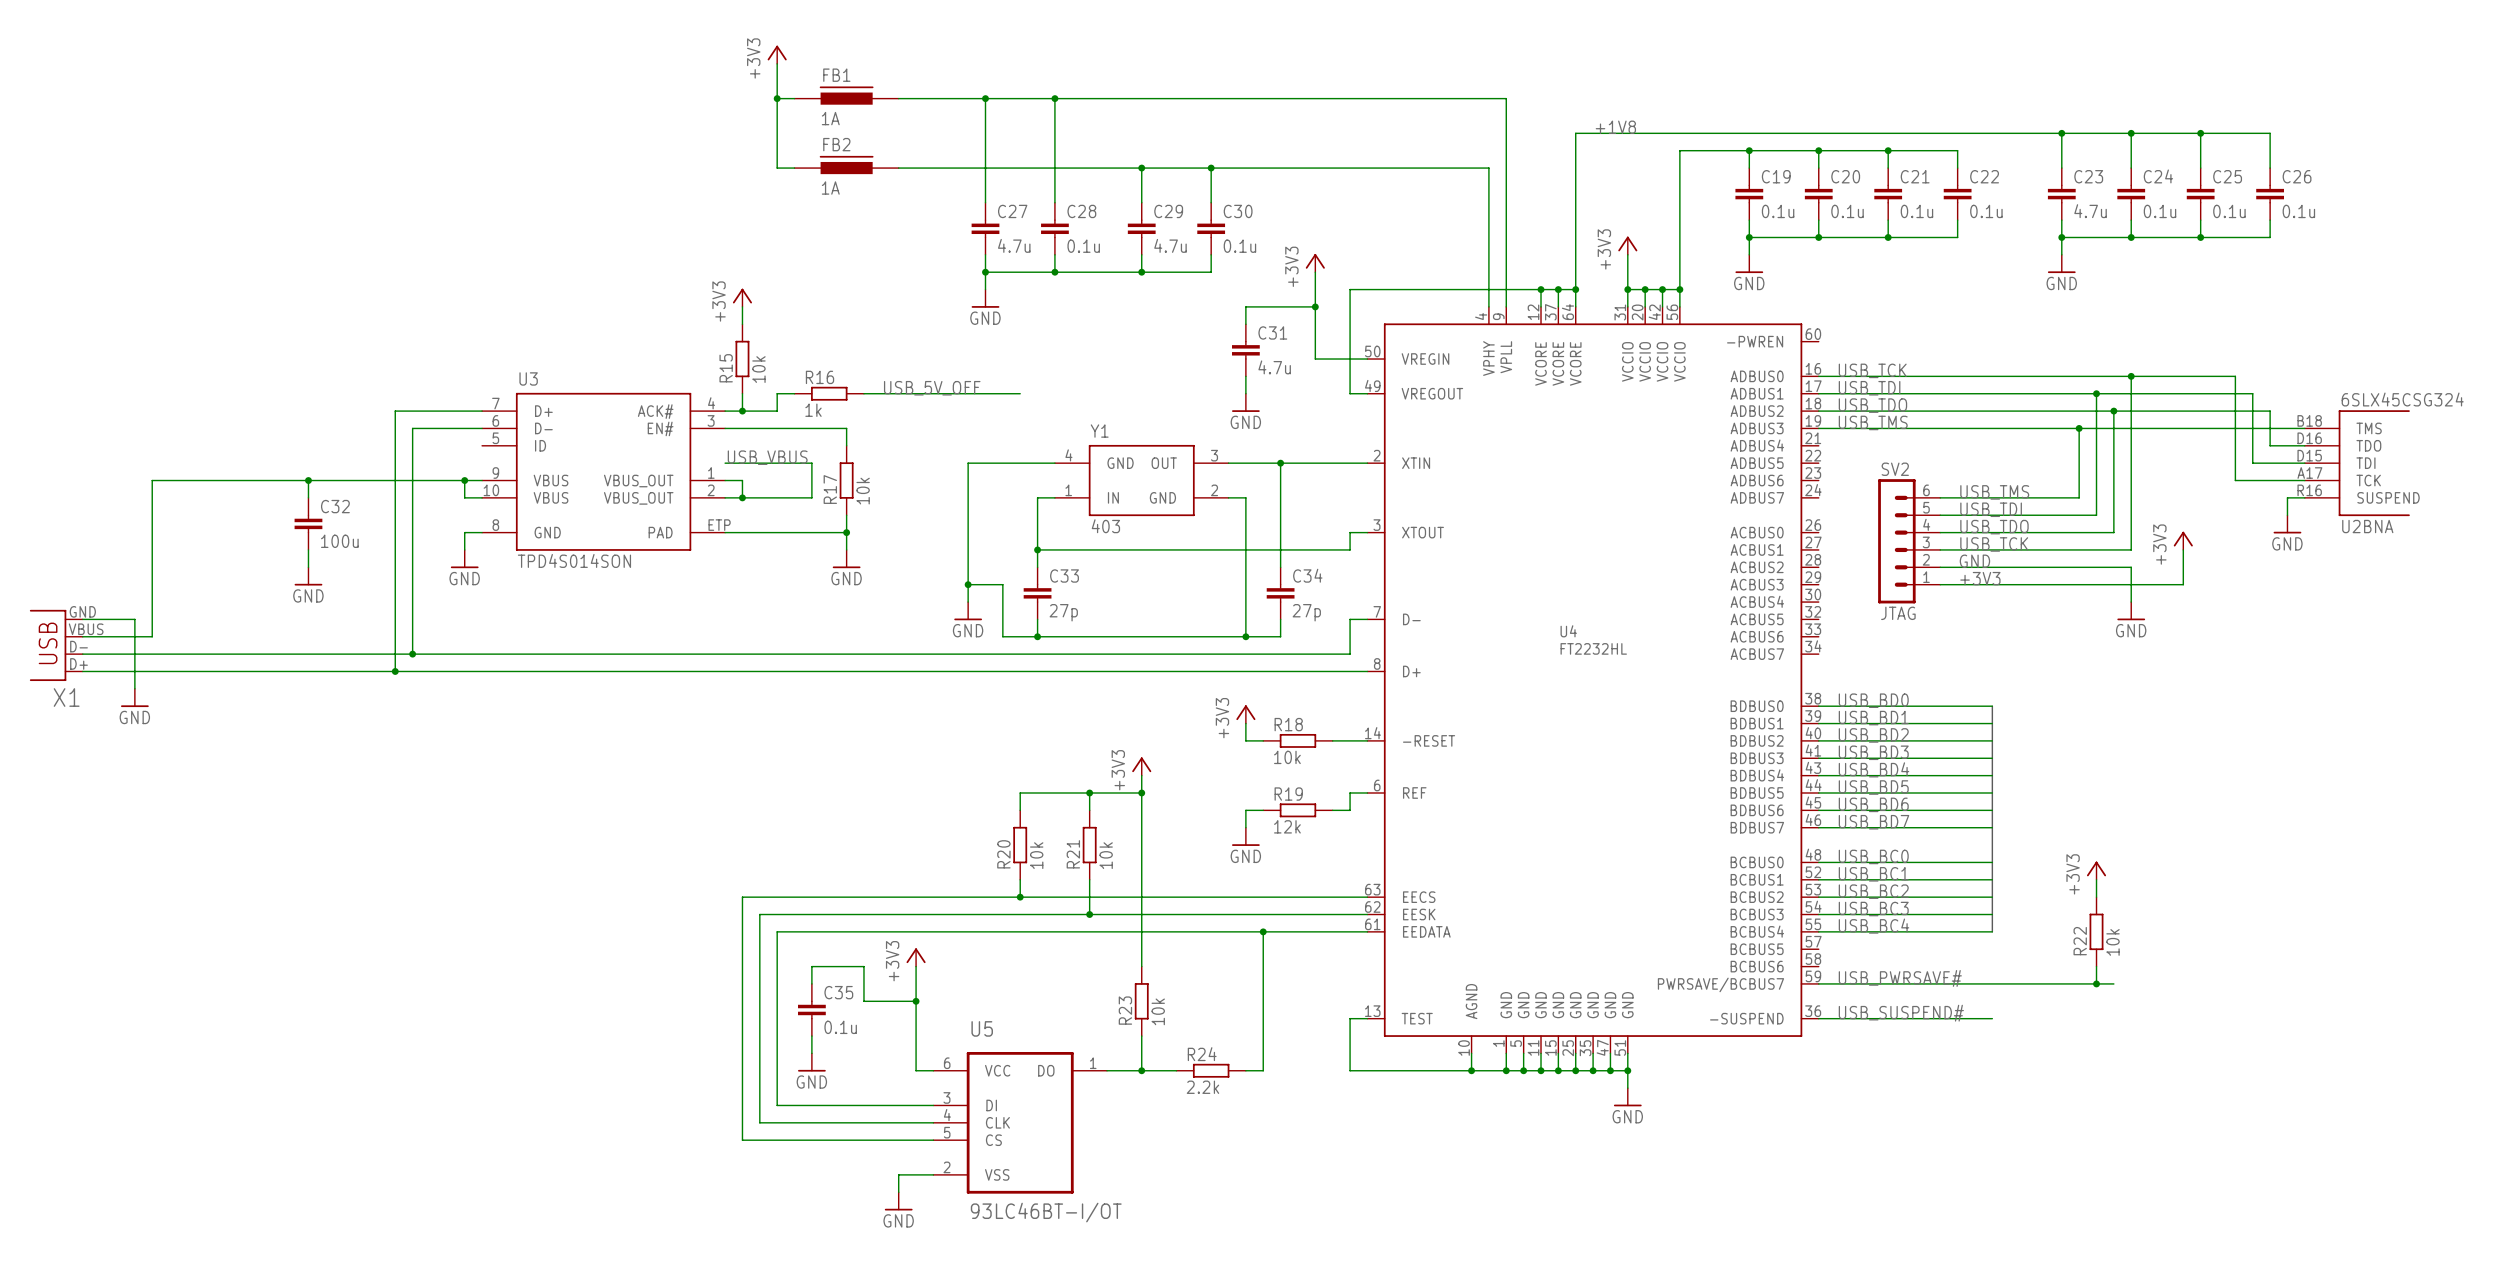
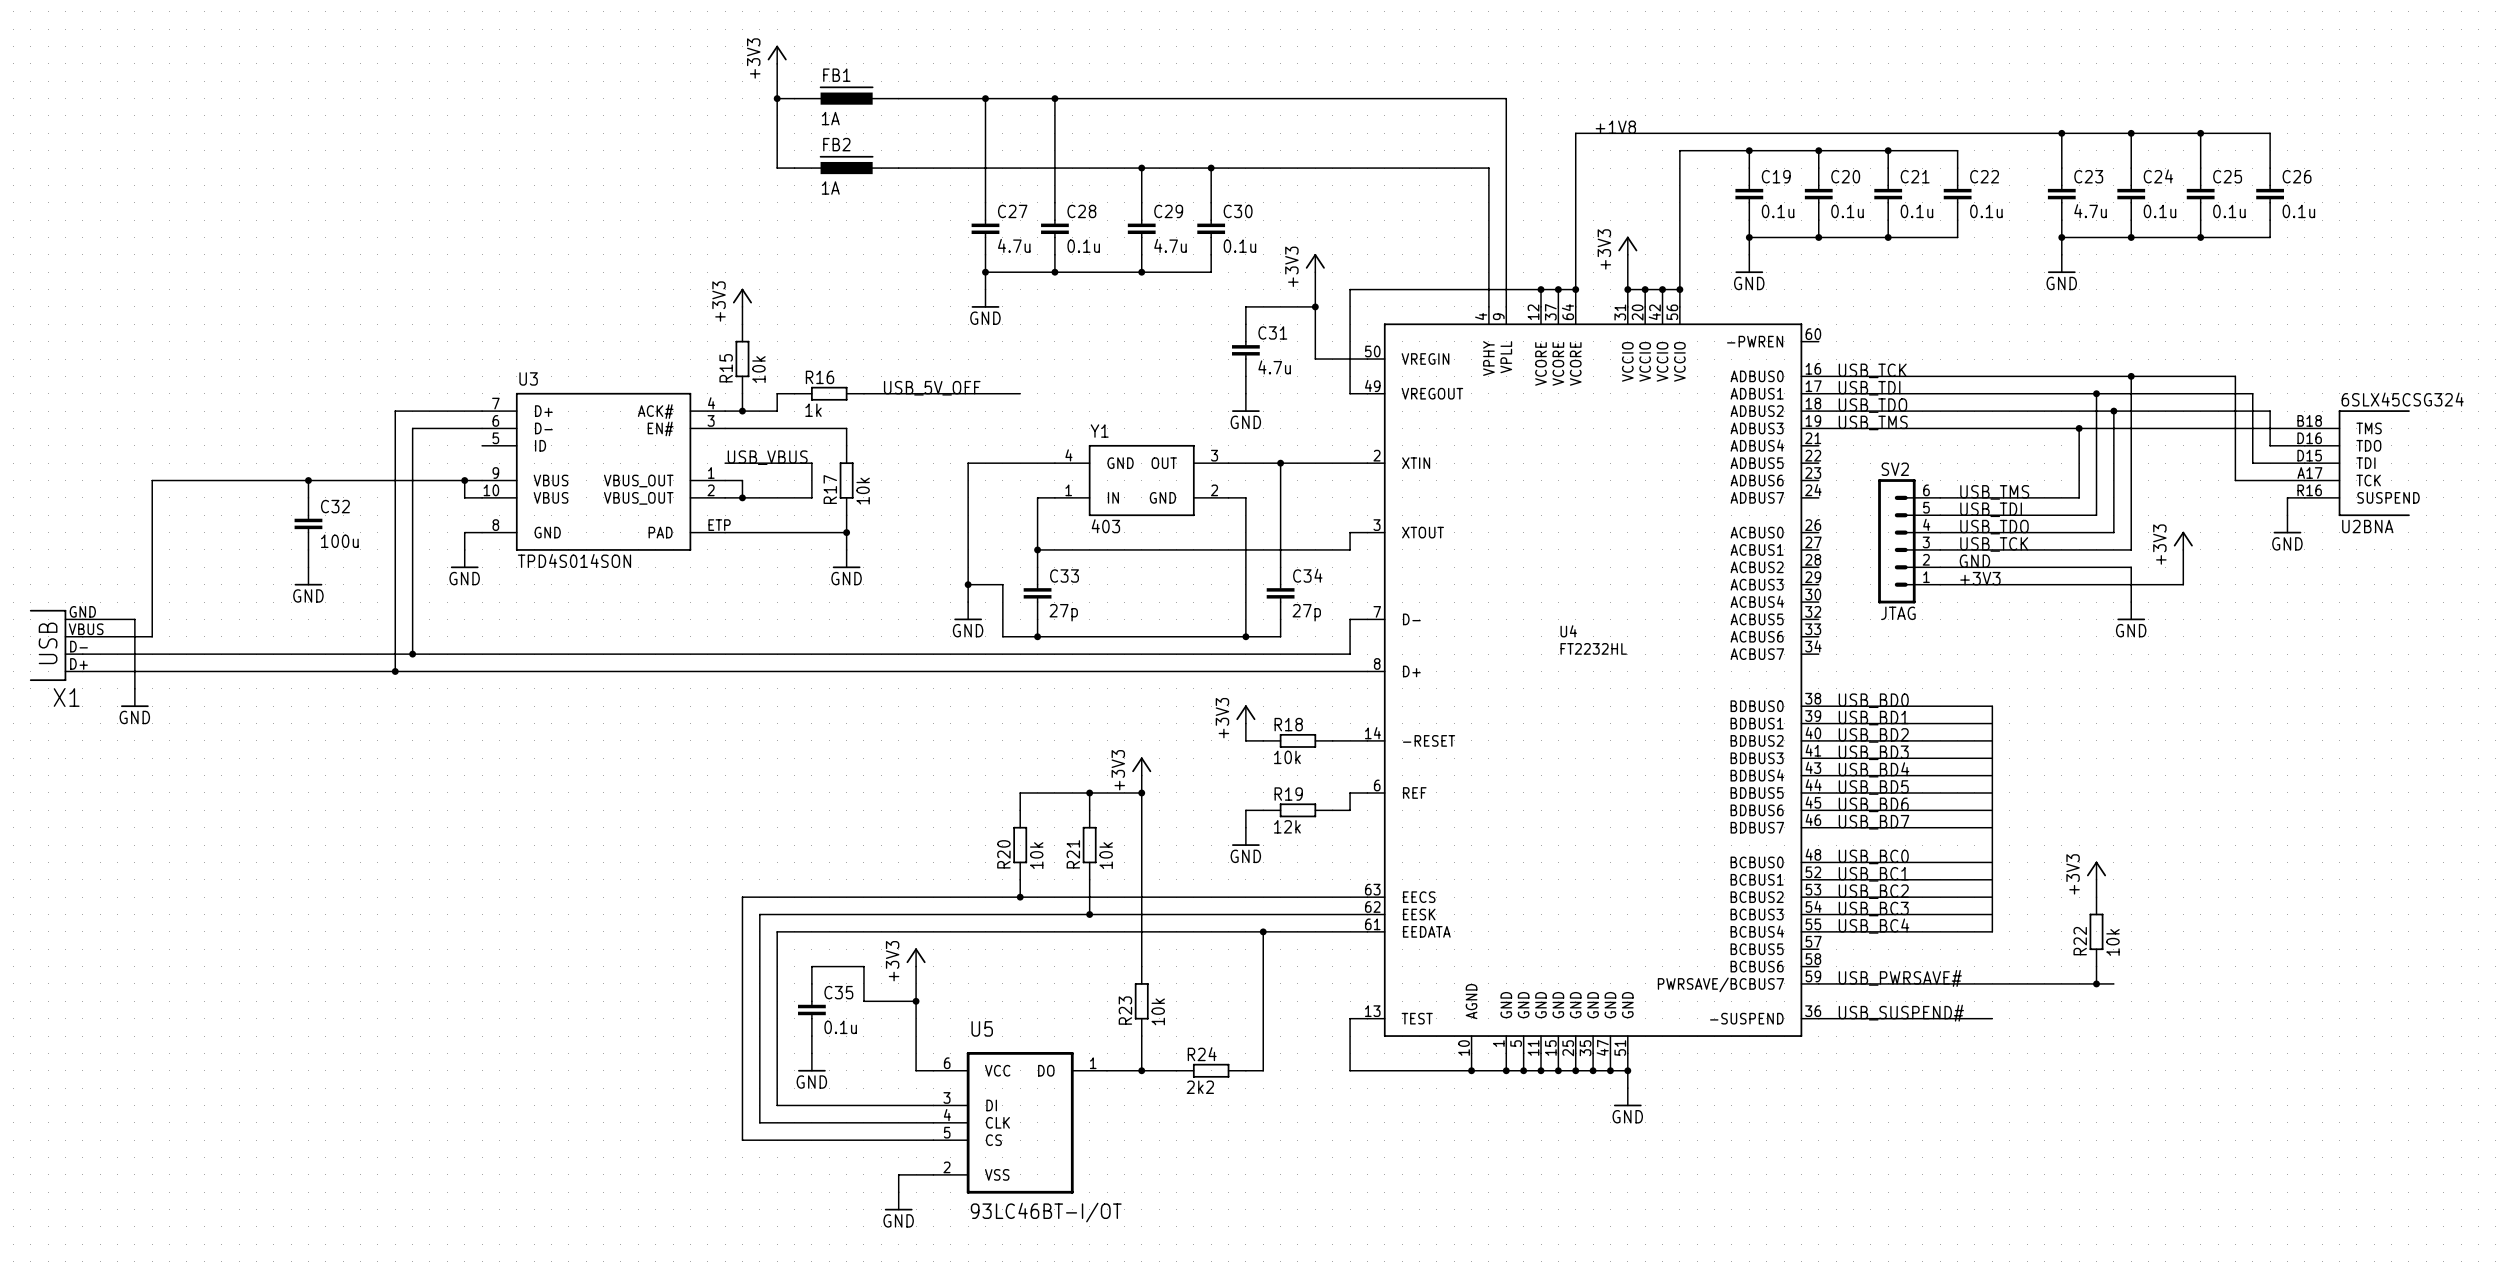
R24 value: 2.2k (1202, 1087) -> 2k2 (1200, 1087)

